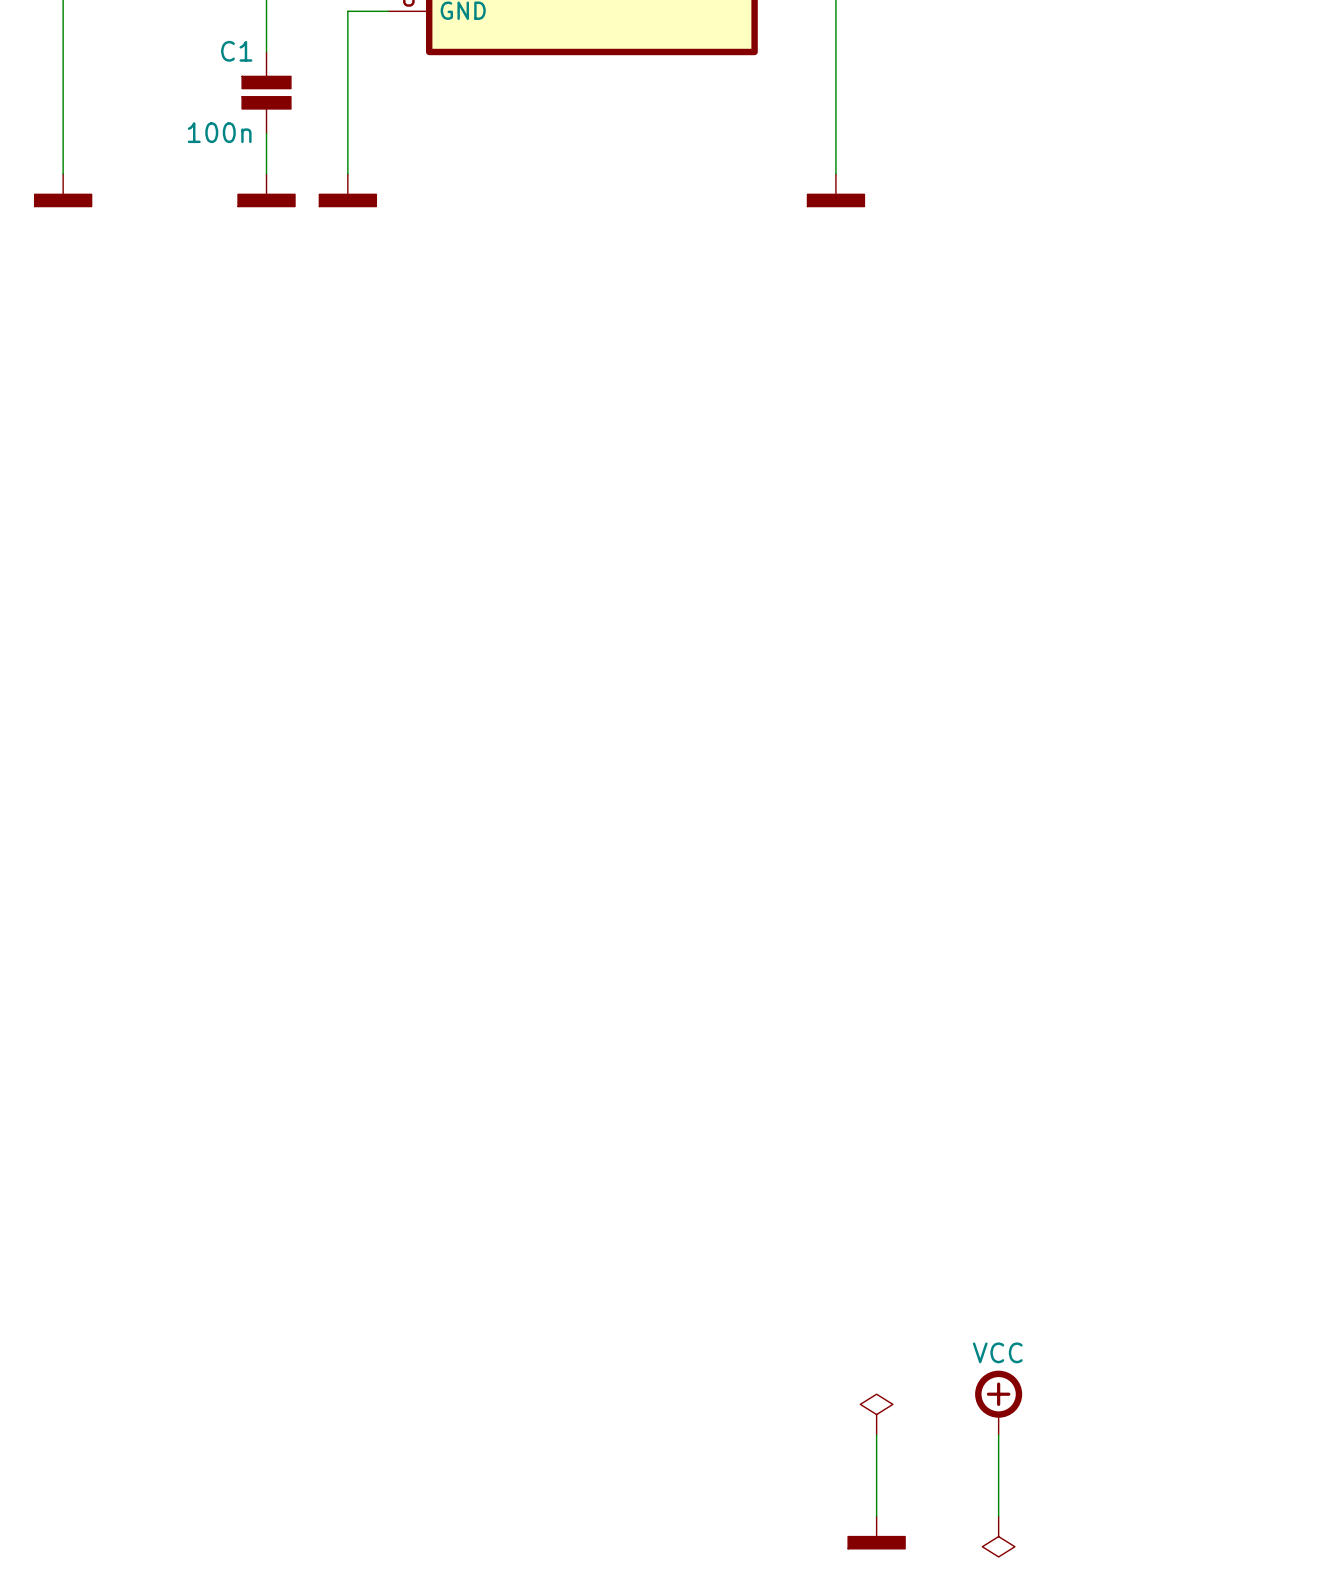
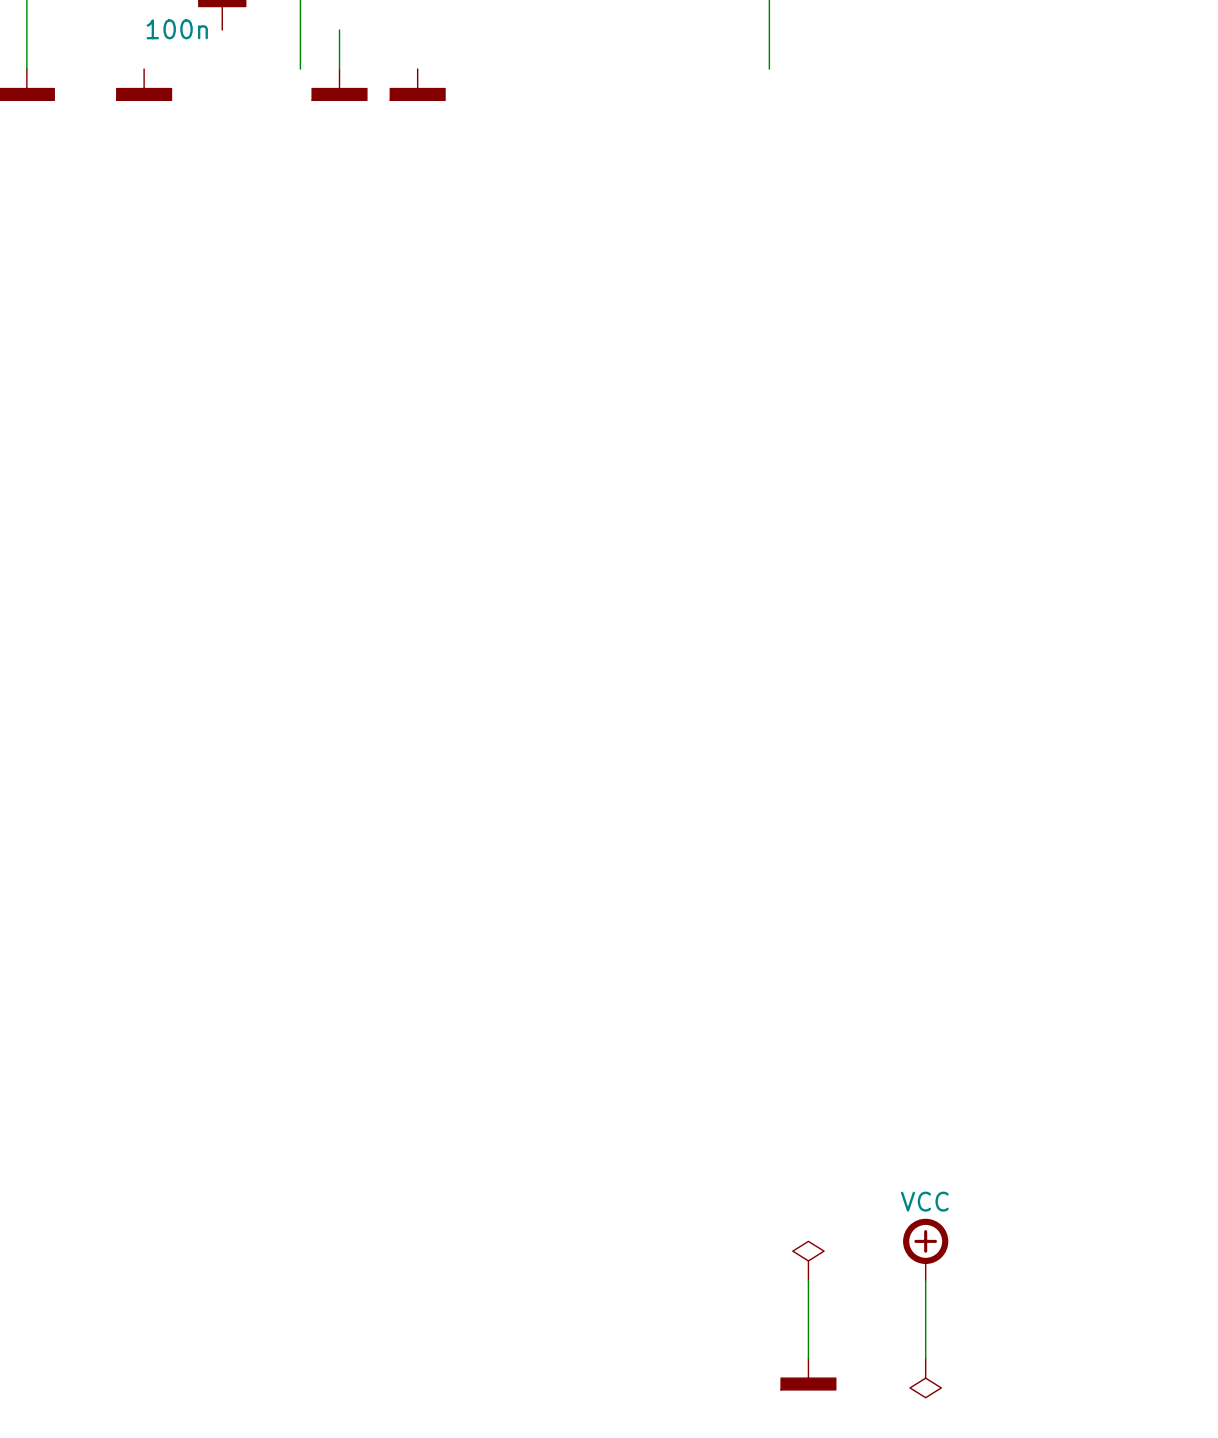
wire: (266, 133) (266, 174) -> (339, 29) (339, 69)
power symbol: none -> (144, 84)
power symbol: (266, 190) -> none
power symbol position: (347, 190) -> (339, 84)
power symbol: none -> (417, 84)
power symbol: (835, 190) -> none

